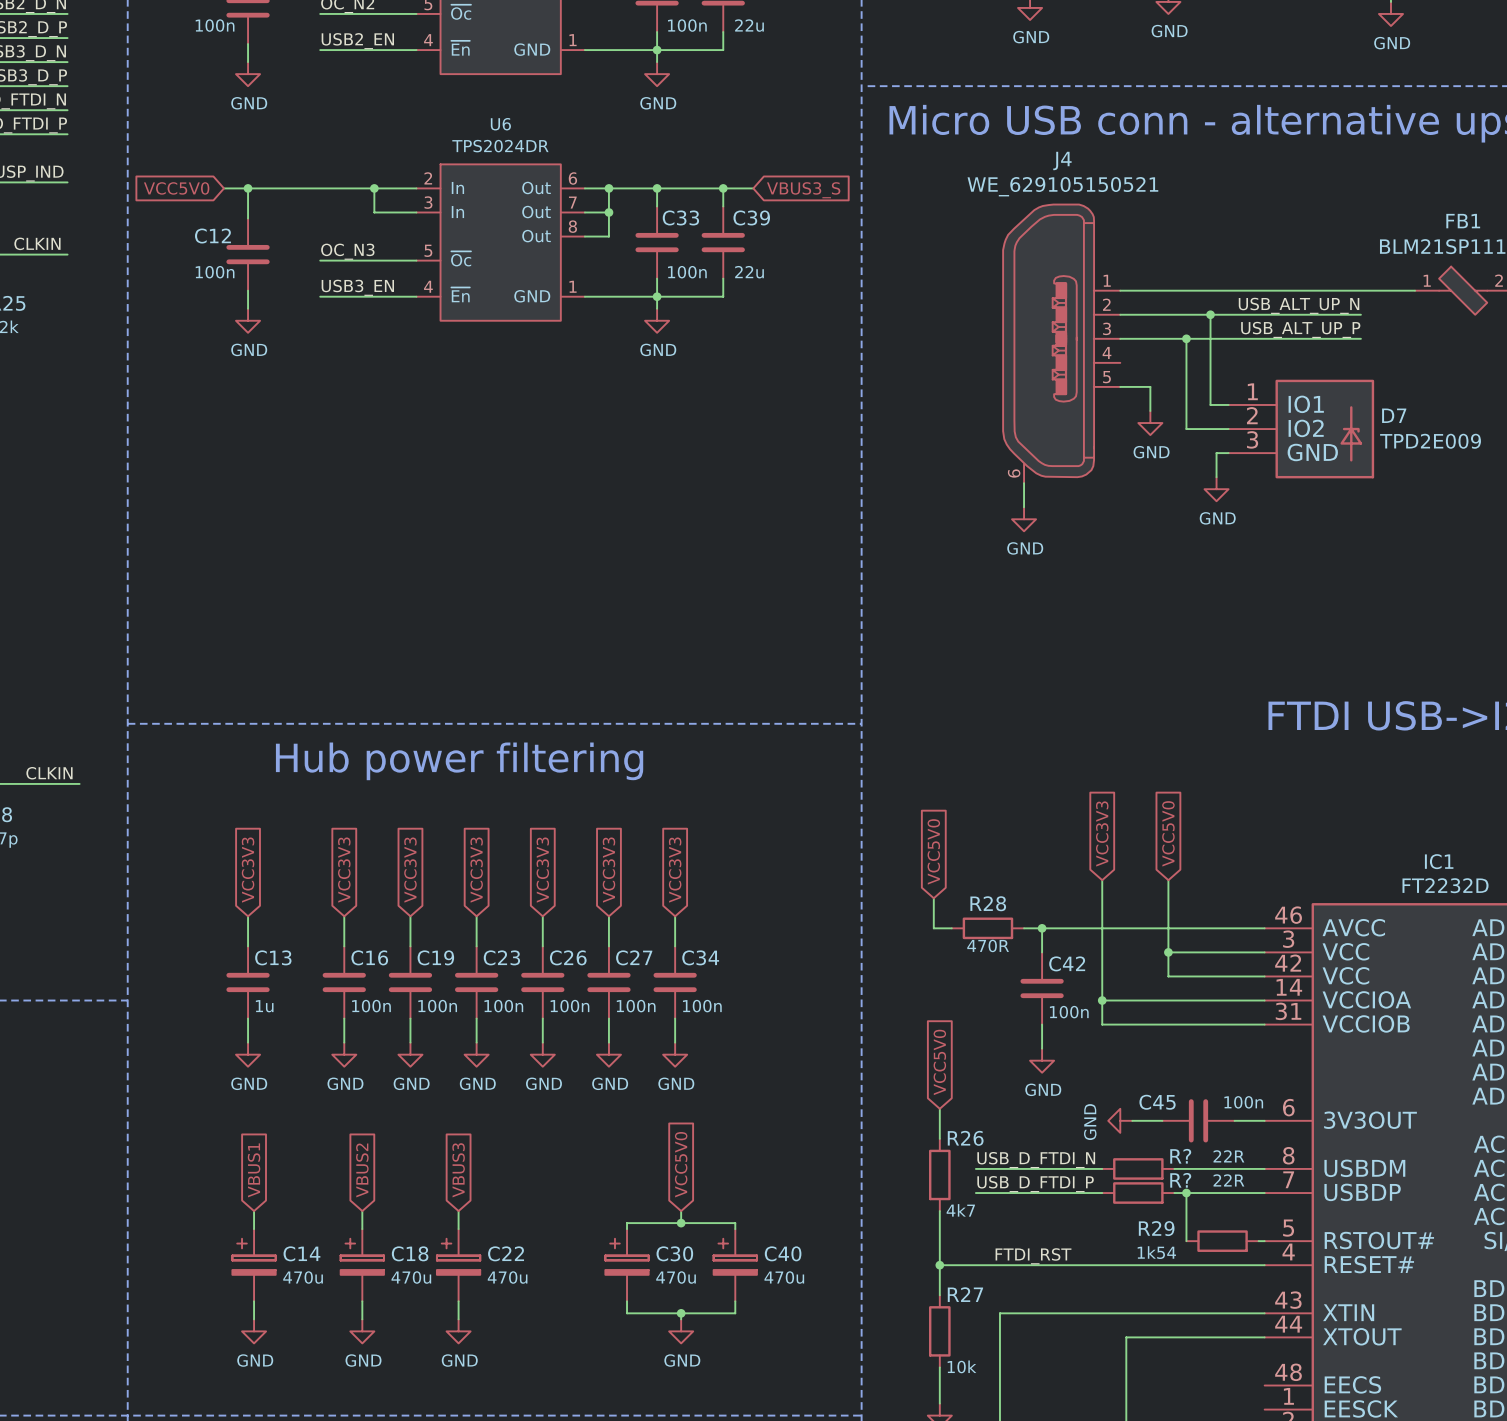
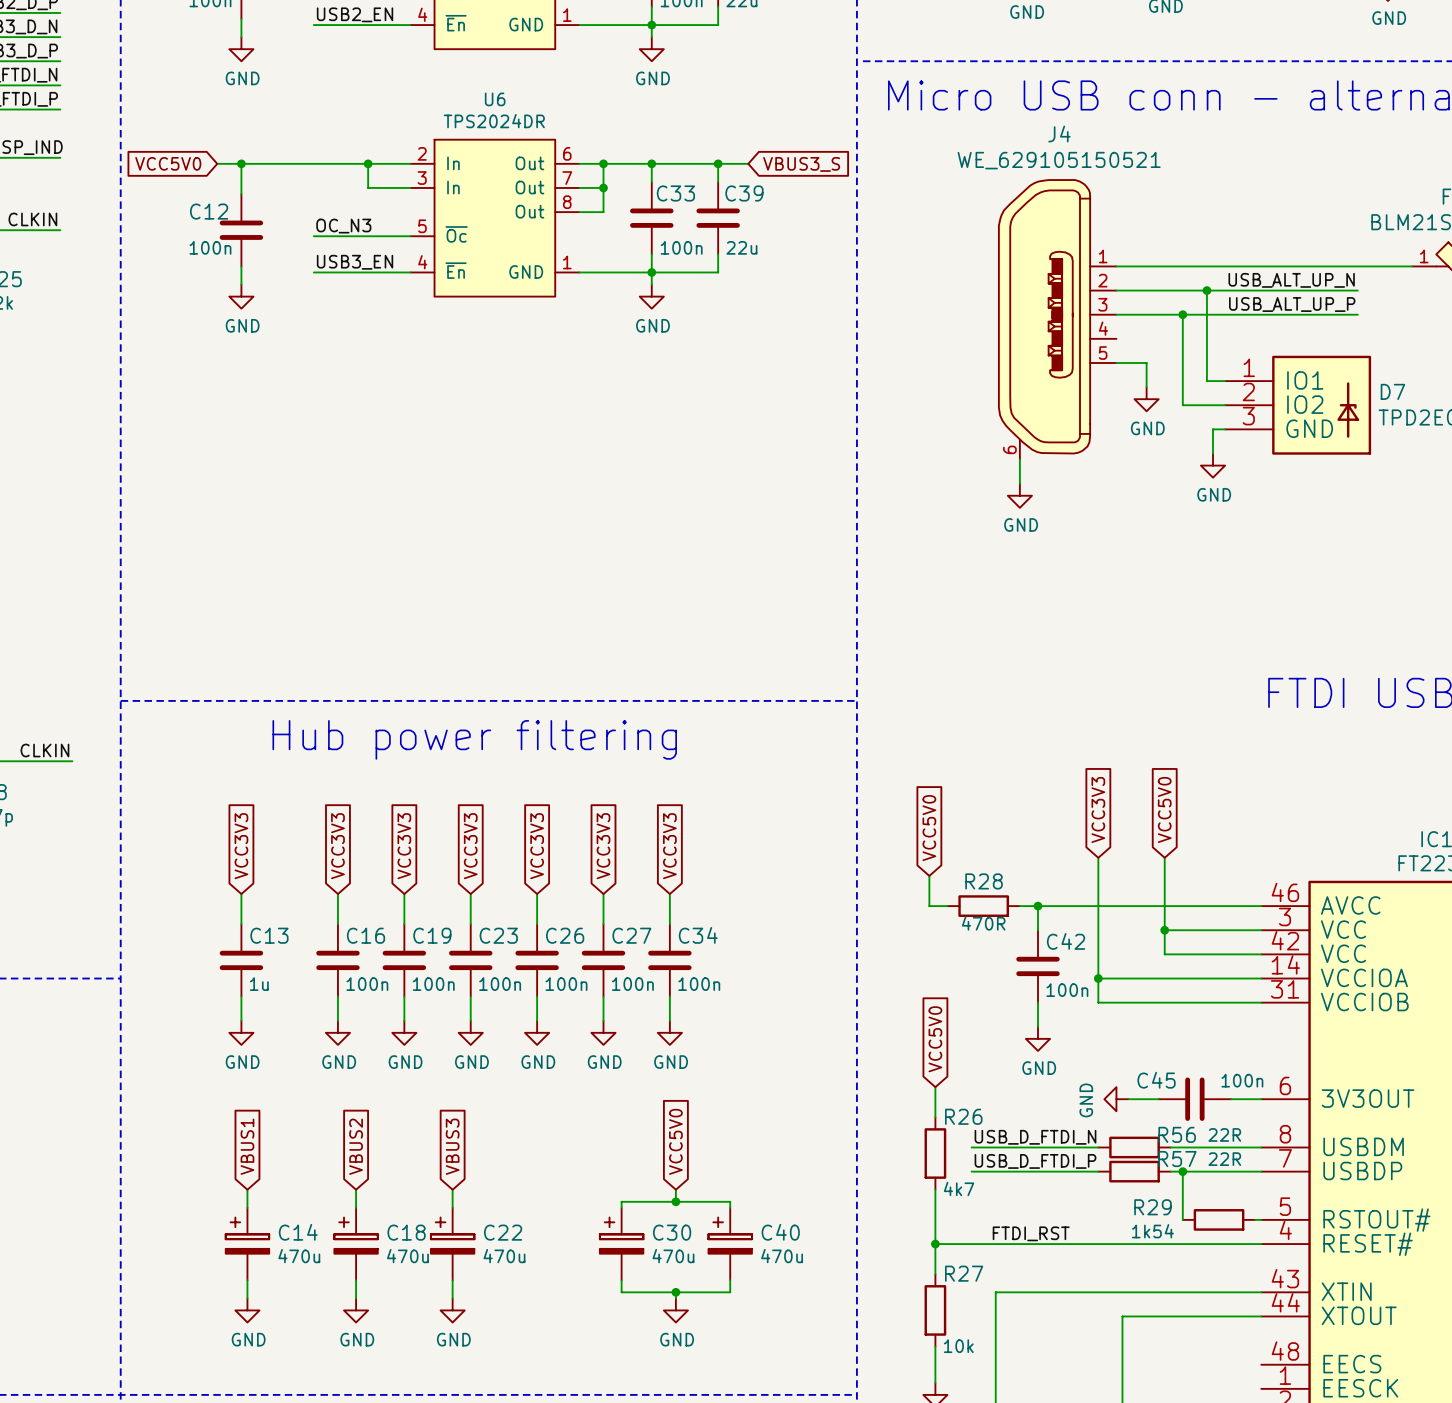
R? name: R? (1180, 1156) -> R56 (1177, 1134)
R? name: R? (1180, 1180) -> R57 (1177, 1159)

